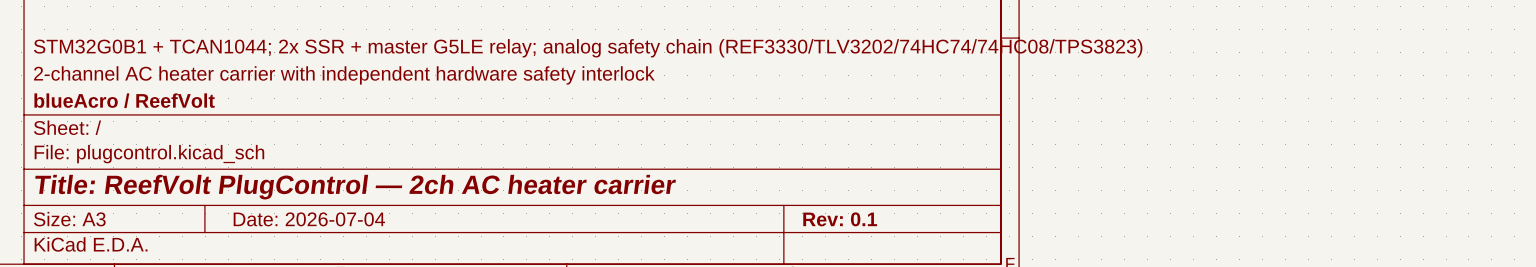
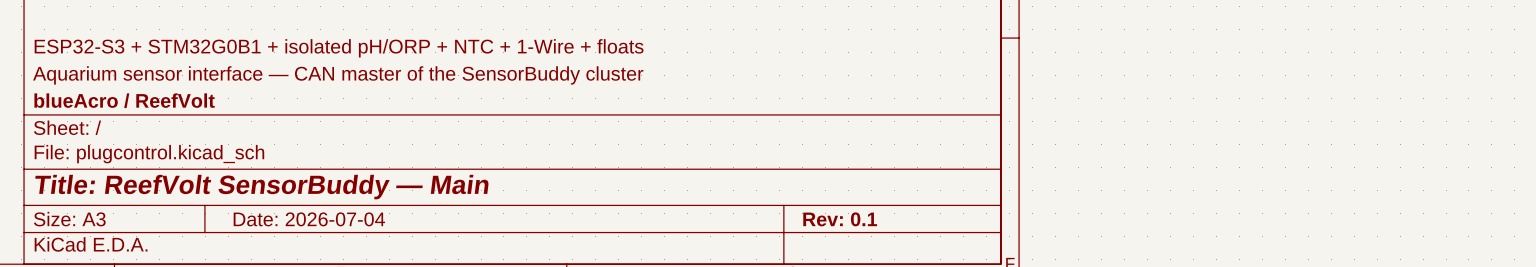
title block: STM32G0B1 + TCAN1044; 2x SSR + master G5LE relay; analog safety chain (REF3330/TLV3202/74HC74/74HC08/TPS3823) (588, 48) -> ESP32-S3 + STM32G0B1 + isolated pH/ORP + NTC + 1-Wire + floats (339, 48)
title block: 2-channel AC heater carrier with independent hardware safety interlock (344, 75) -> Aquarium sensor interface — CAN master of the SensorBuddy cluster (338, 75)
title block: Title: ReefVolt PlugControl — 2ch AC heater carrier (355, 187) -> Title: ReefVolt SensorBuddy — Main (261, 187)

